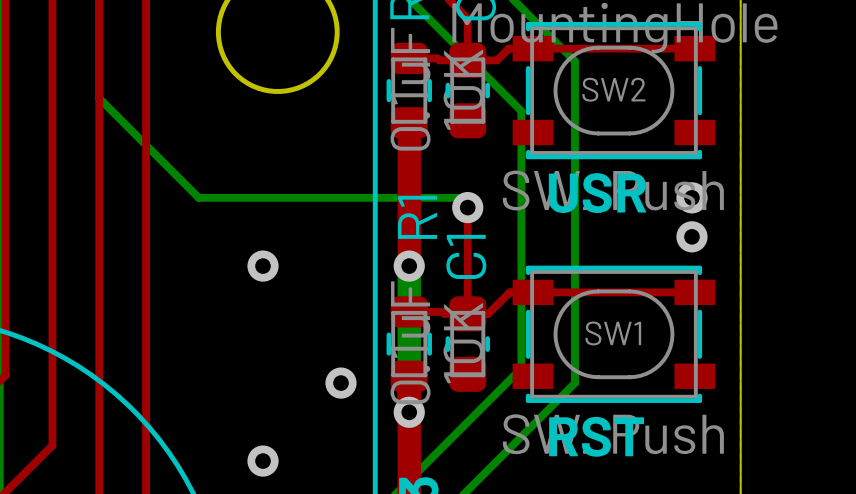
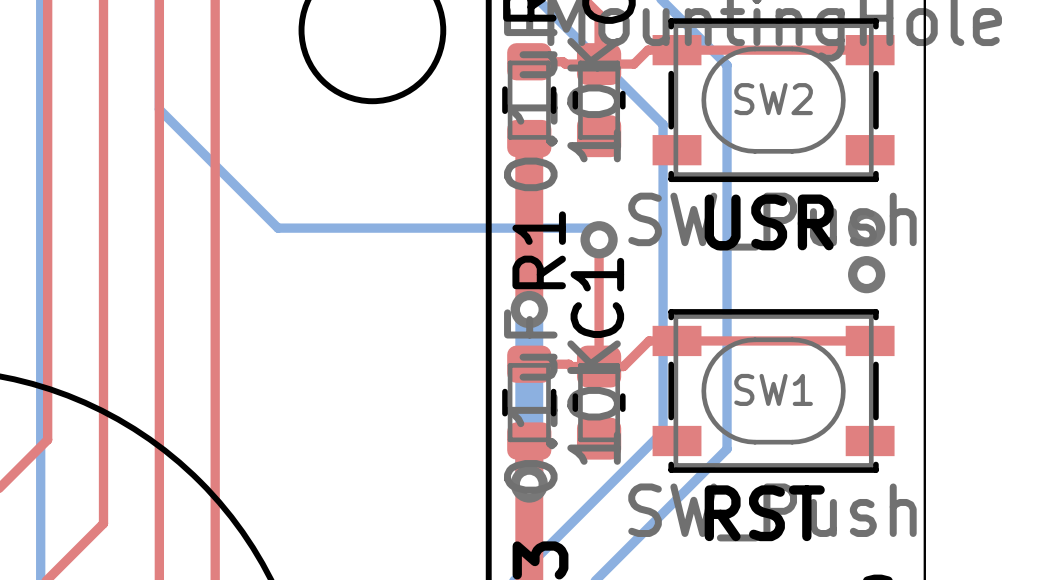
via: (263, 266) -> none
via: (341, 383) -> none
via: (263, 461) -> none

